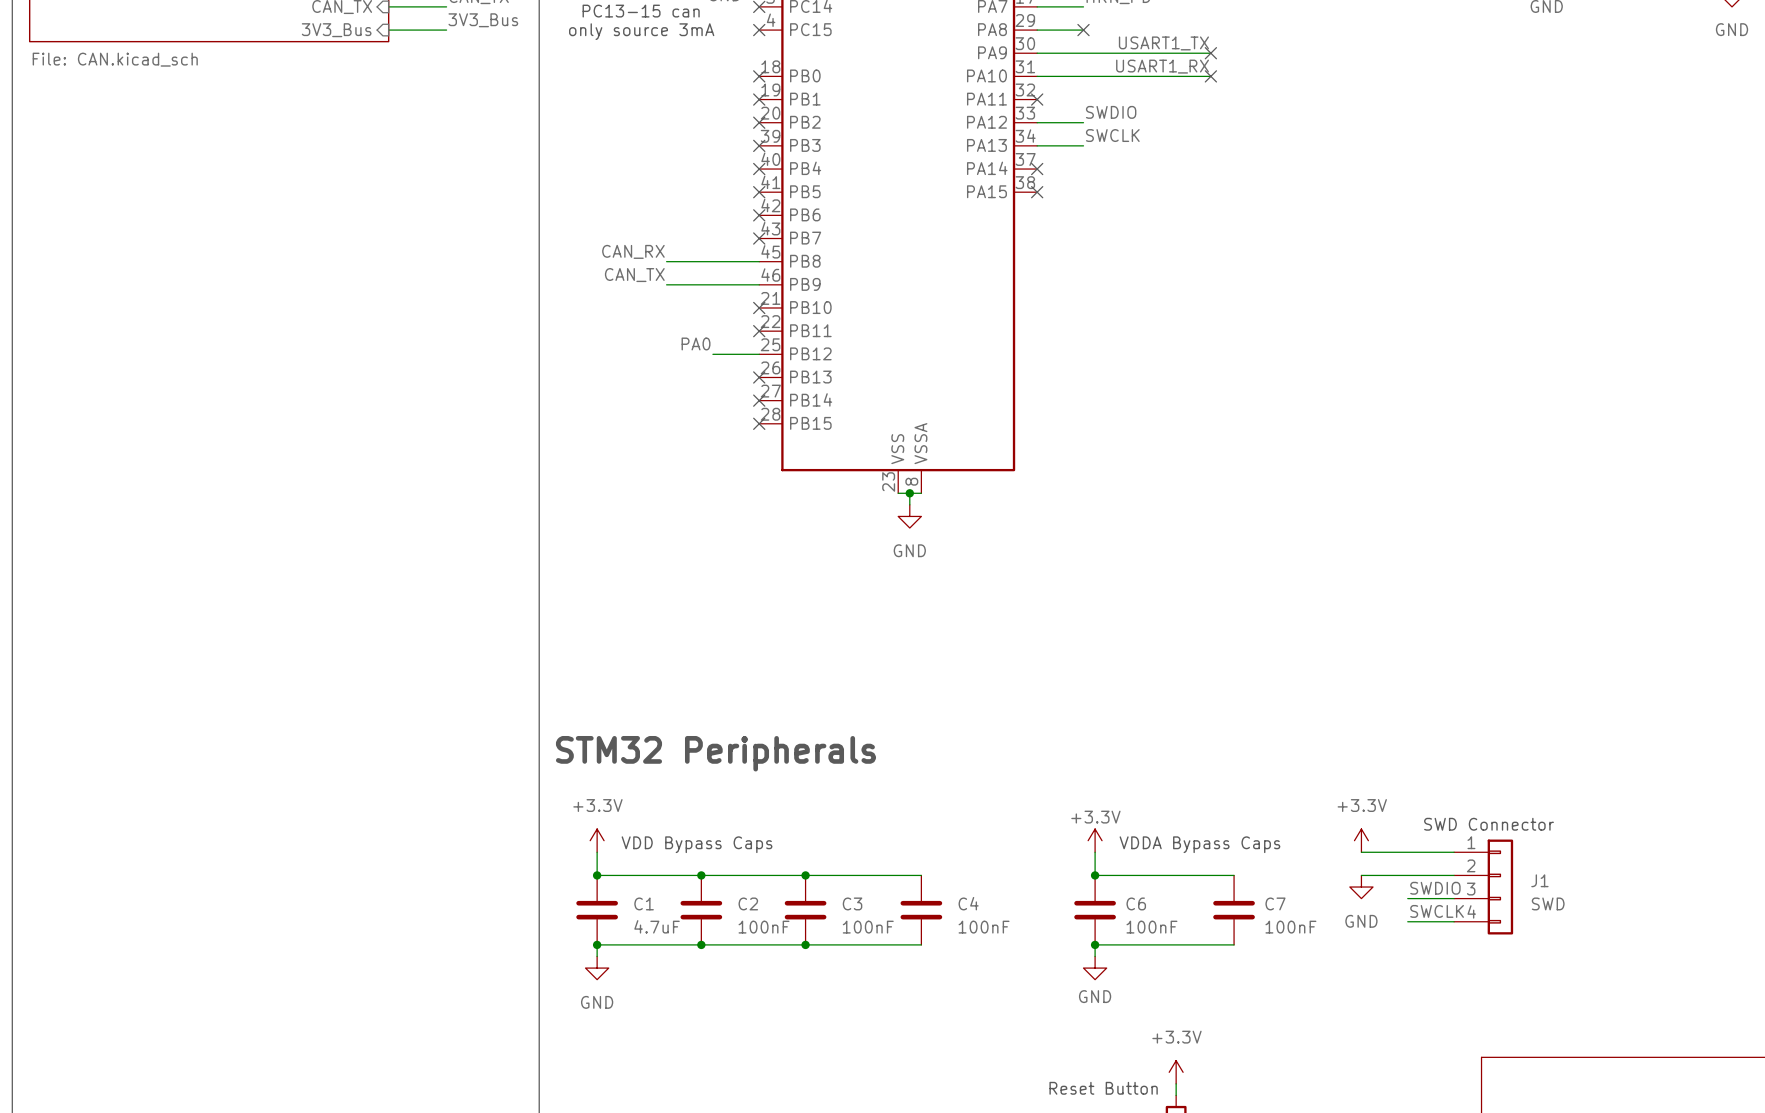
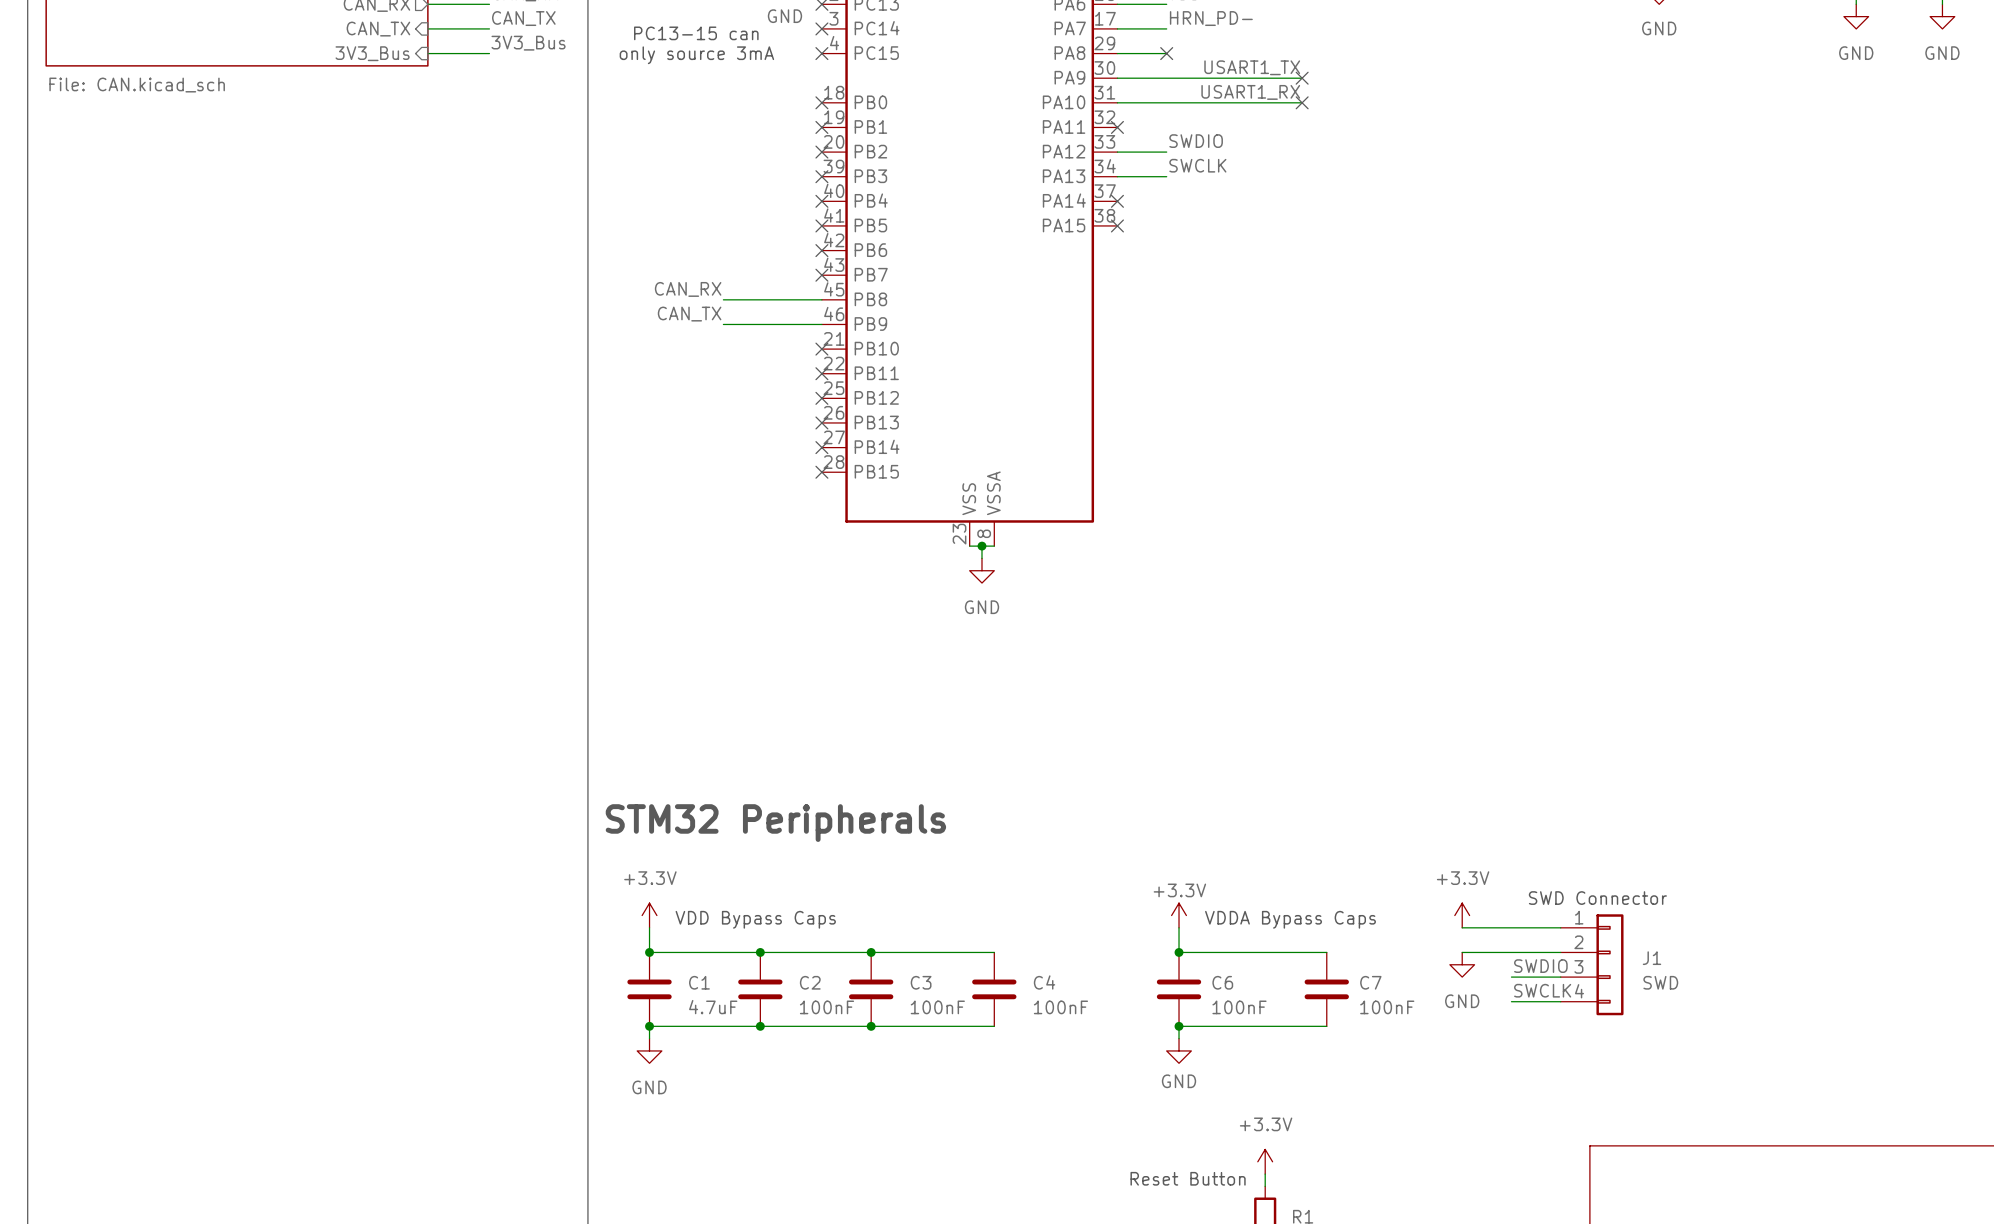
label: PA0 (696, 343) -> none
wire: (712, 354) (759, 354) -> none
no-connect mark: none -> (821, 398)

